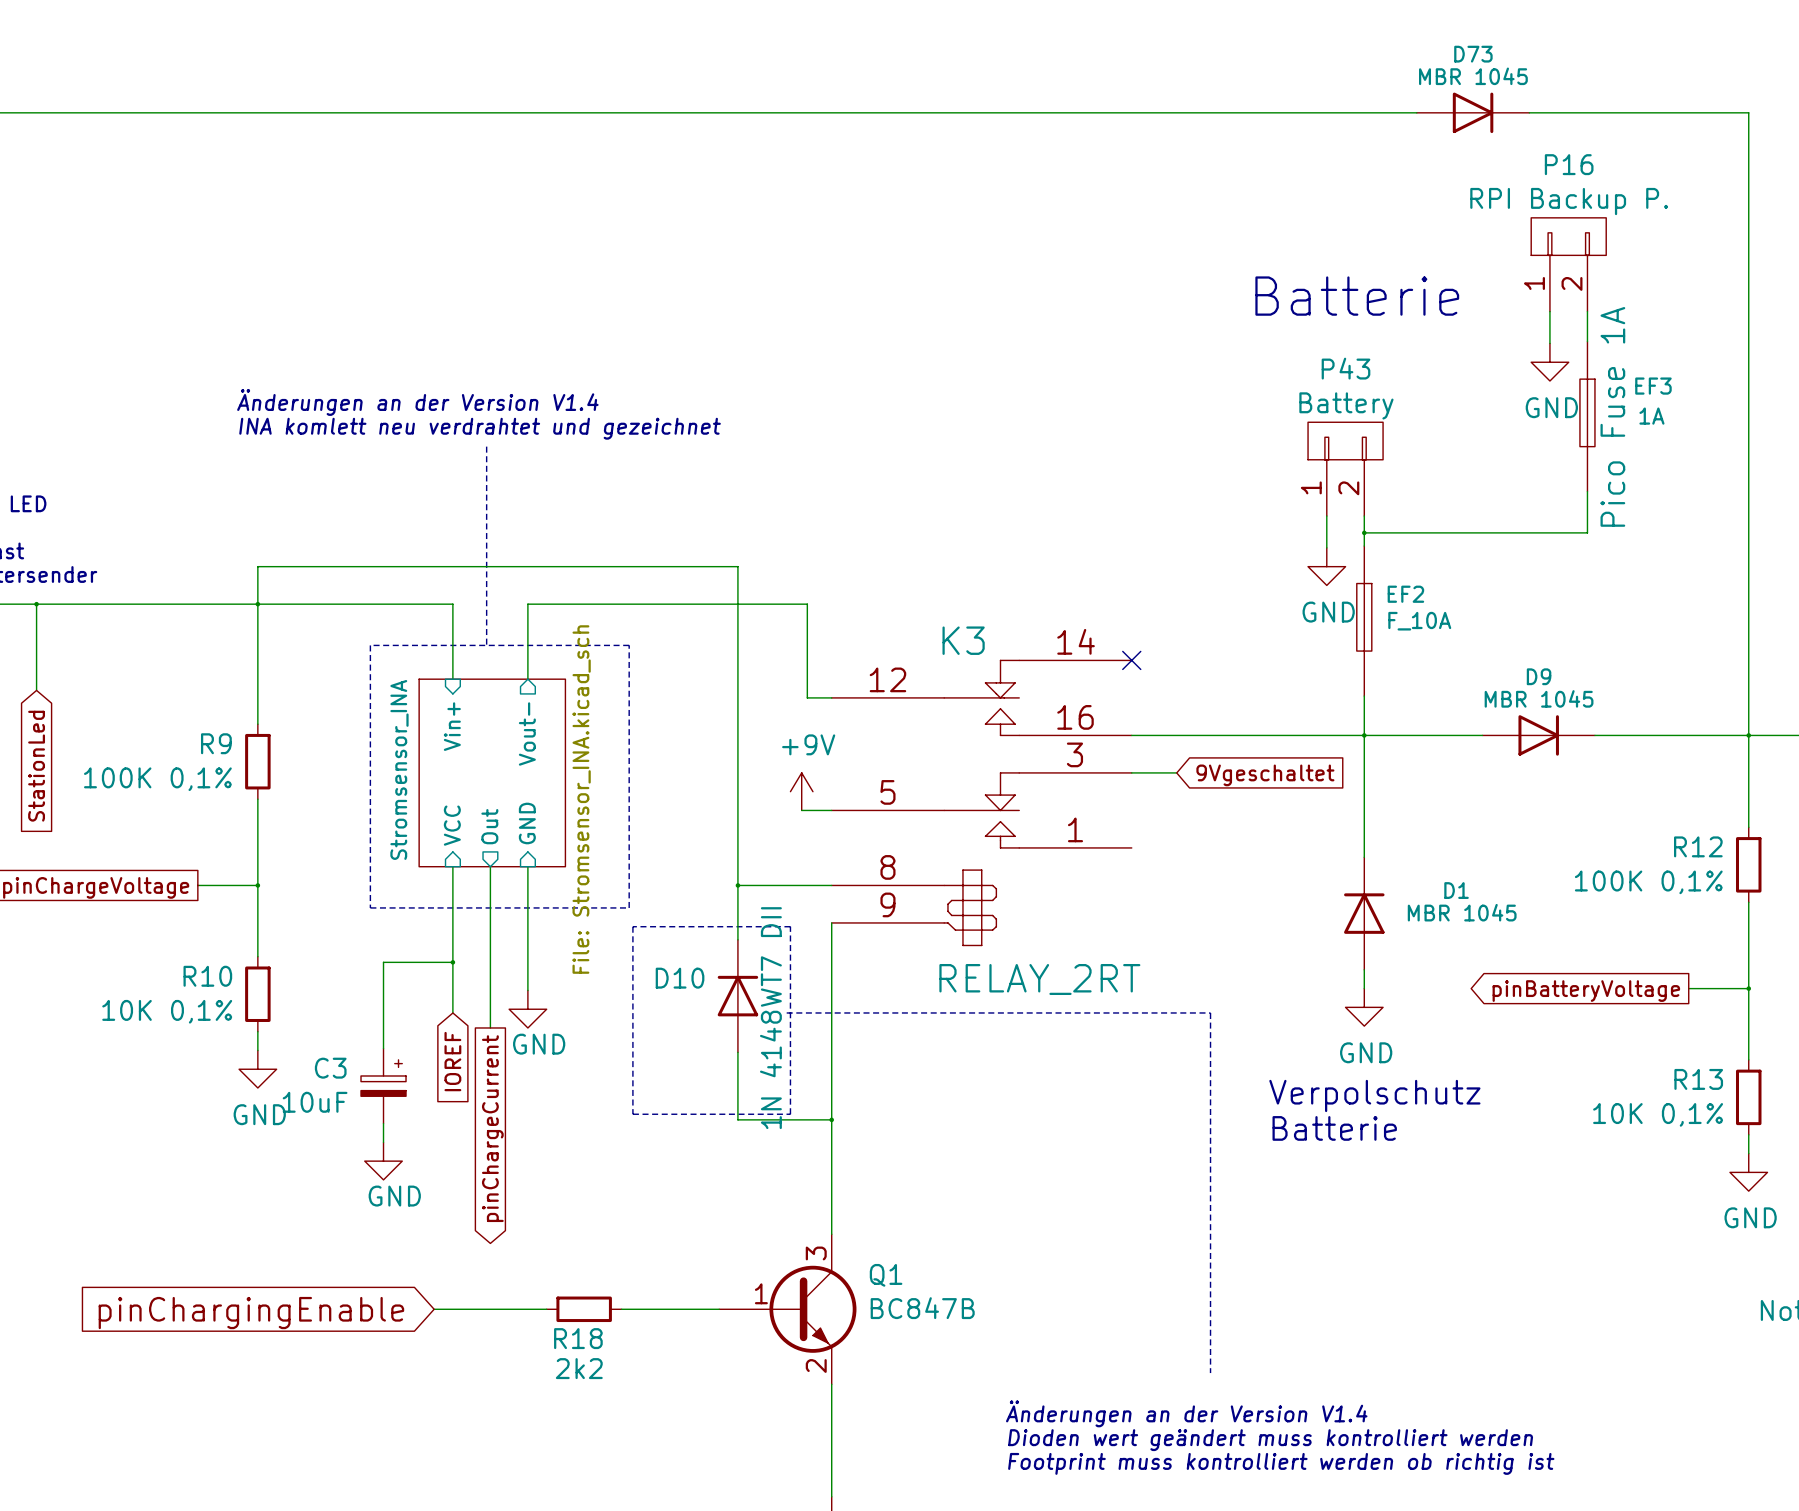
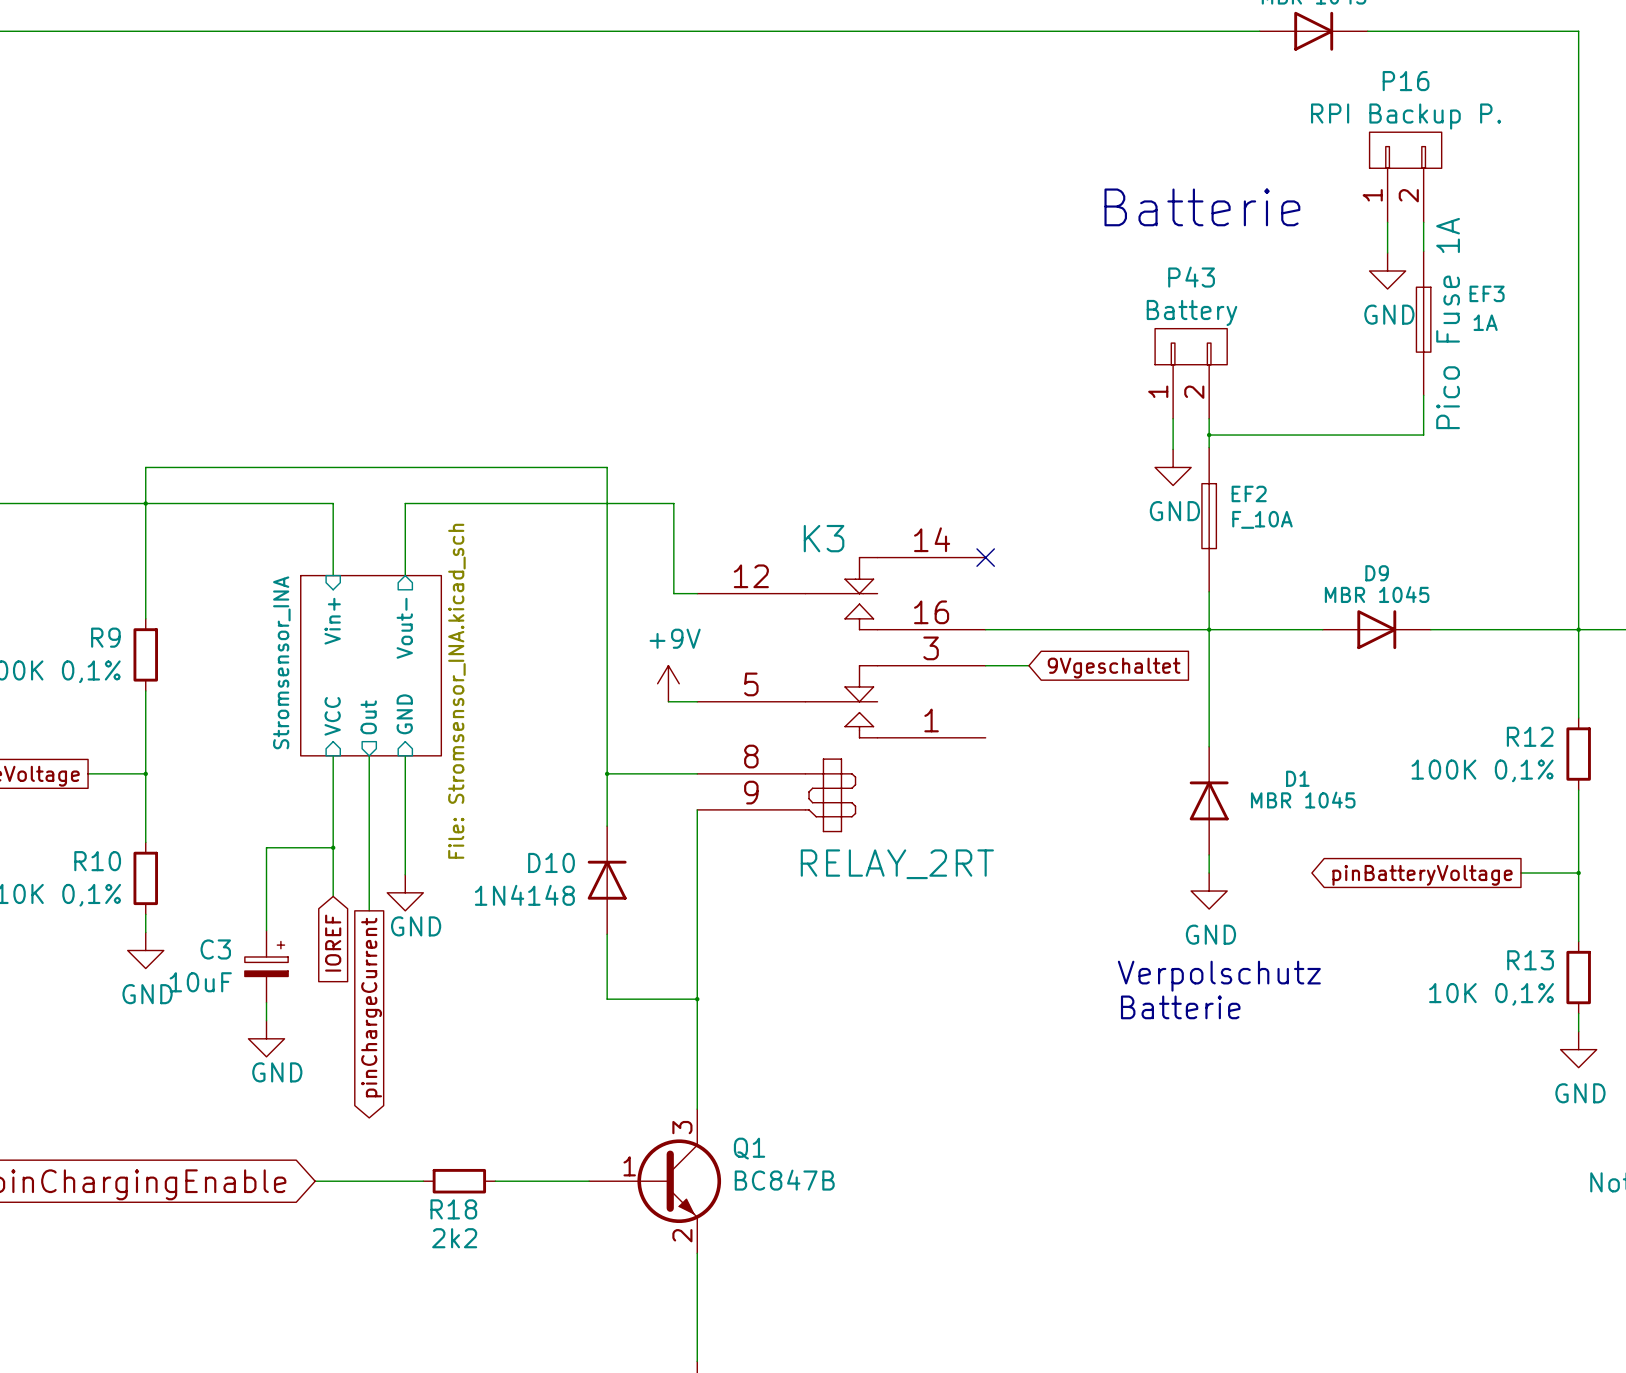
text: Änderungen an der Version V1.4 (417, 402) -> none
text: INA komlett neu verdrahtet und gezeichnet (480, 428) -> none
line: (486, 446) (486, 645) -> none
line: (370, 645) (370, 907) (629, 907) (629, 645) (370, 645) -> none
line: (632, 926) (632, 1114) (790, 1114) (790, 926) (632, 926) -> none
line: (786, 1012) (1210, 1012) (1210, 1373) -> none
D10 value: 1N 4148WT7 DII (770, 1018) -> 1N4148 (524, 895)
text: Änderungen an der Version V1.4 (1186, 1413) -> none
text: Dioden wert geändert muss kontrolliert werden (1270, 1440) -> none
text: Footprint muss kontrolliert werden ob richtig ist (1281, 1463) -> none

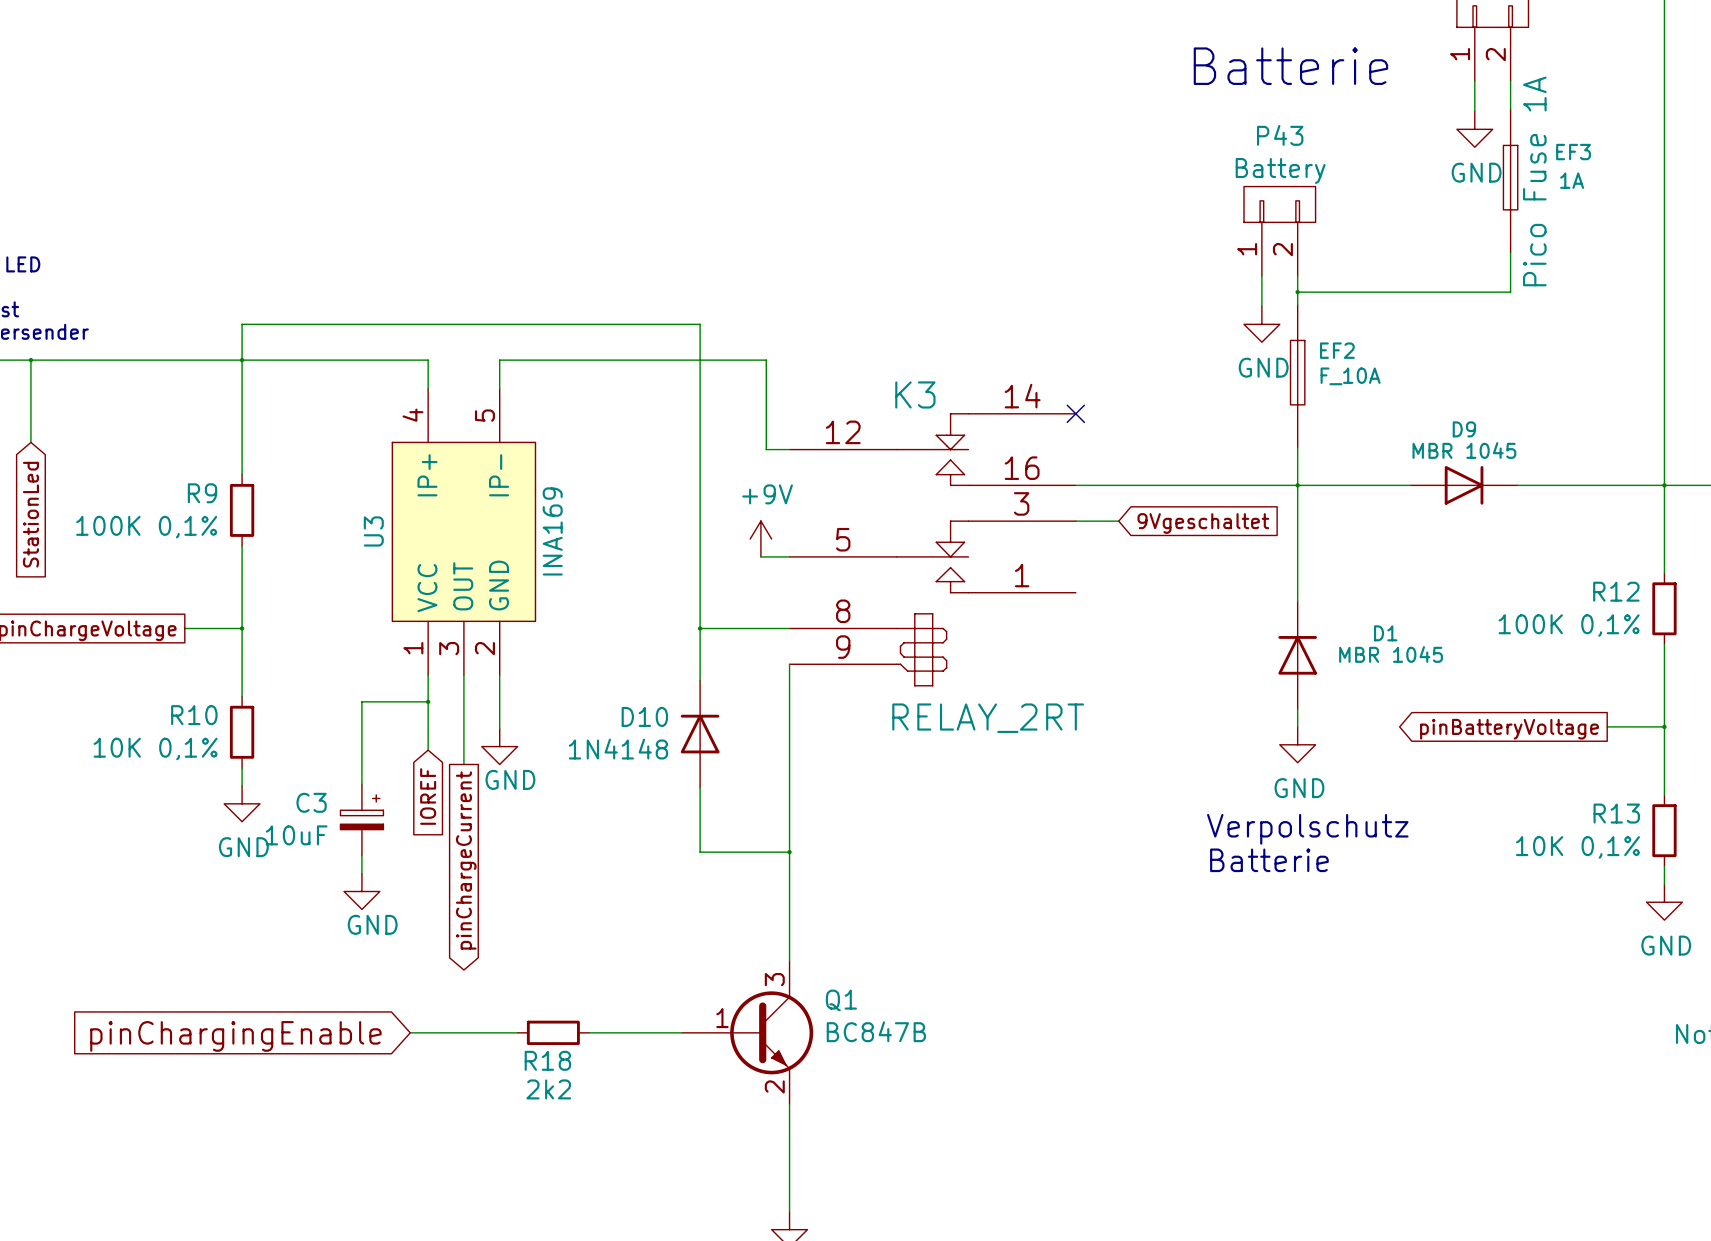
sheet pin: Vin+ (332, 621) -> none
sheet pin: Vout- (404, 628) -> none
sheet Stromsensor_INA: File: Stromsensor_INA.kicad_sch (371, 665) -> none
U3: none -> INA169 (463, 531)
sheet pin: GND (404, 714) -> none
sheet pin: VCC (332, 716) -> none
sheet pin: Out (368, 717) -> none

